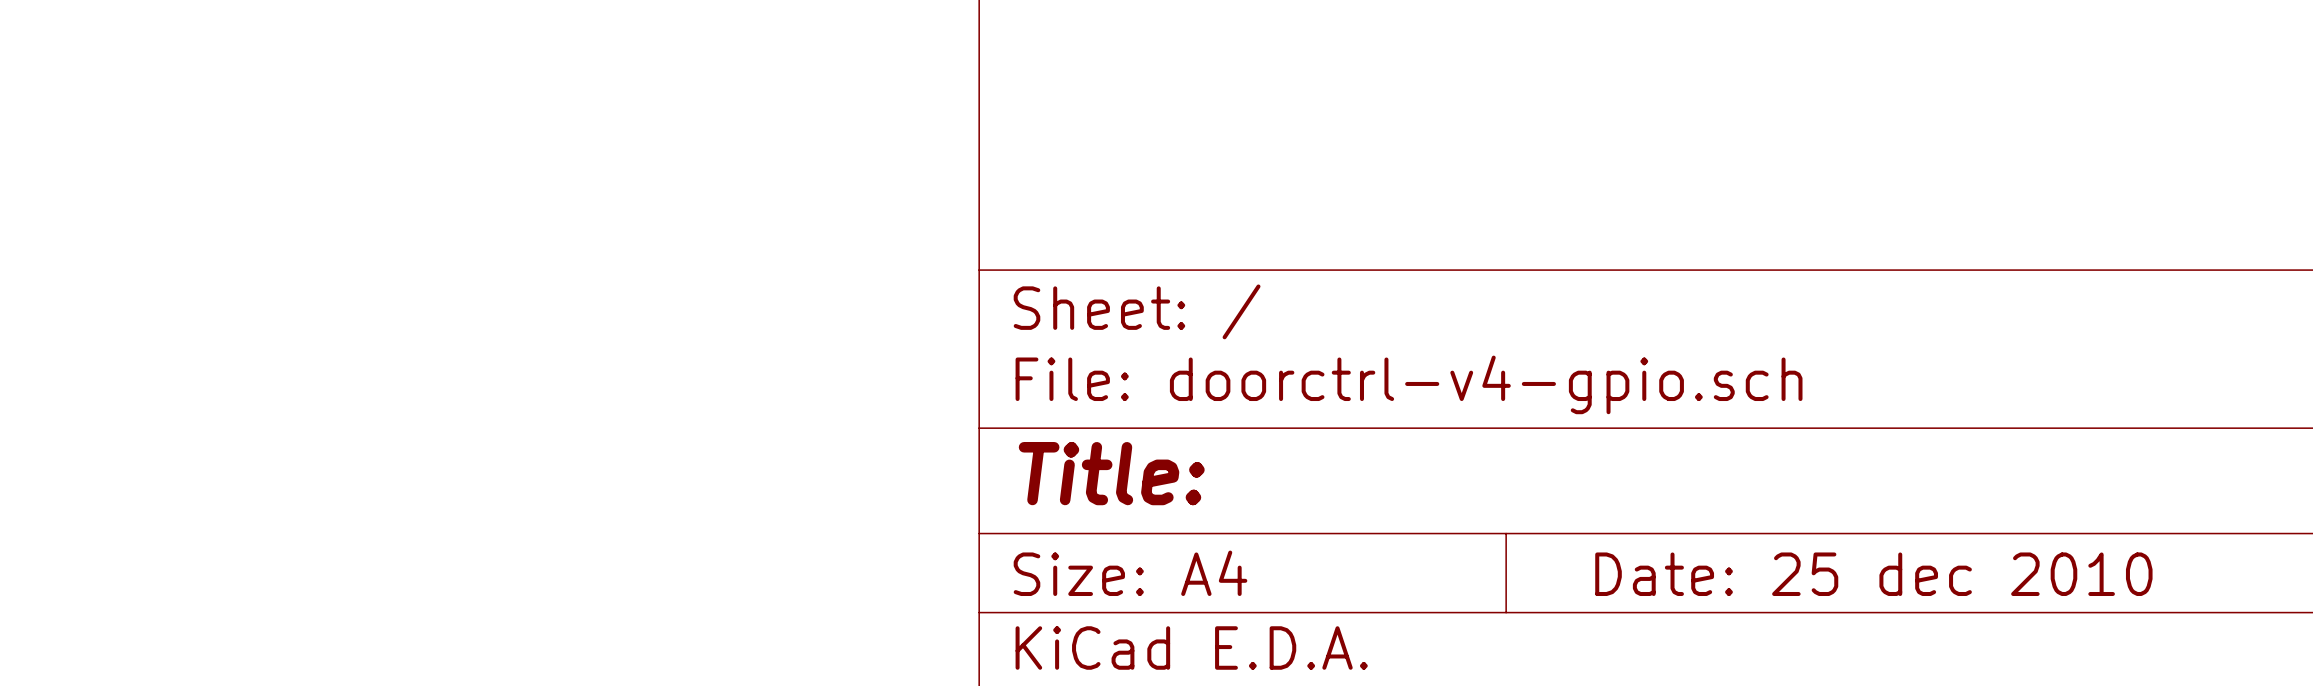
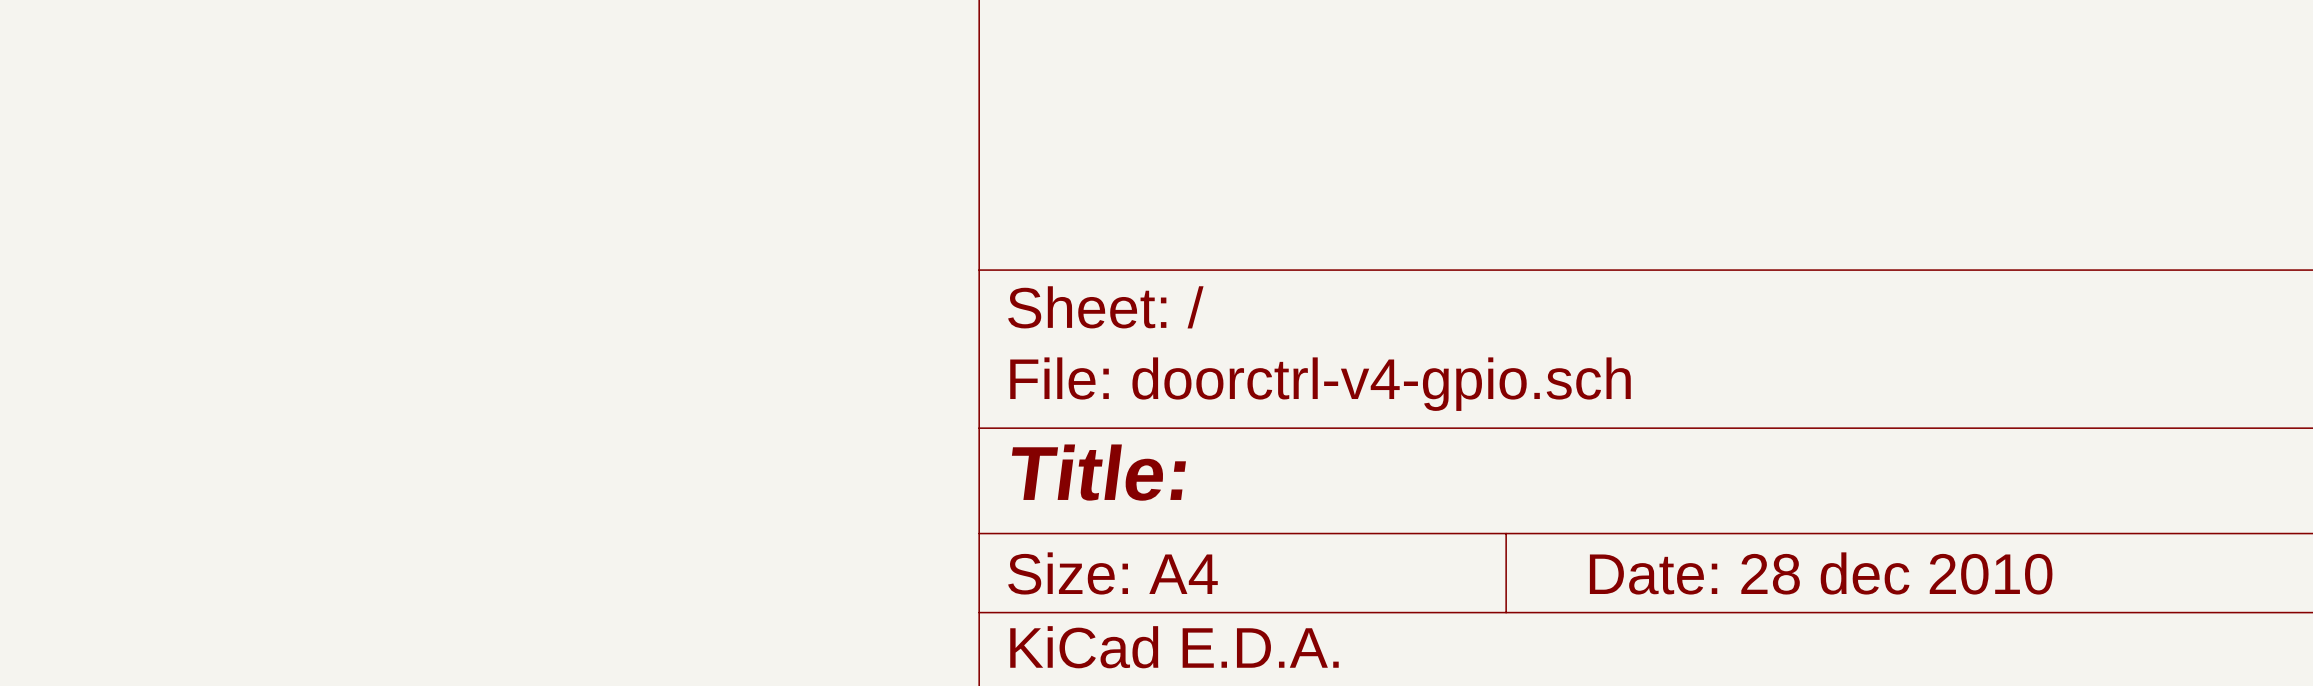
title block: Date: 25 dec 2010 (1873, 574) -> Date: 28 dec 2010 (1821, 573)

